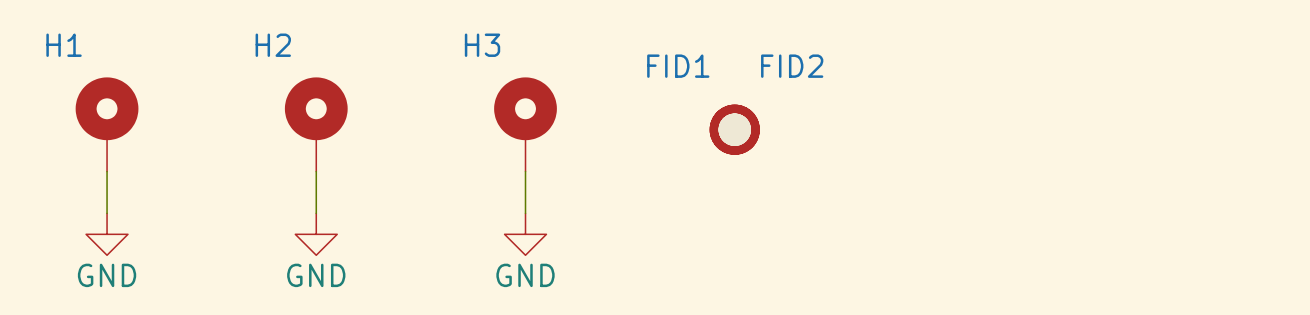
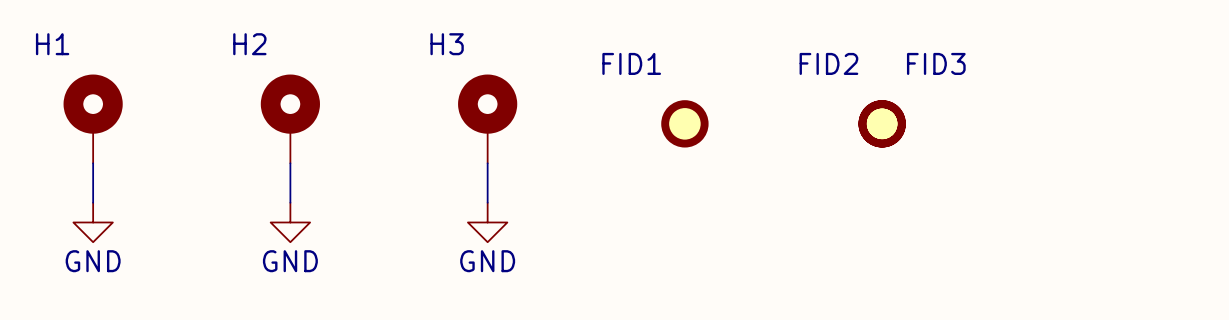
FID2 name position: FID2 (792, 66) -> FID2 (828, 63)
FID2 position: (734, 129) -> (882, 123)
FID3: none -> (882, 123)

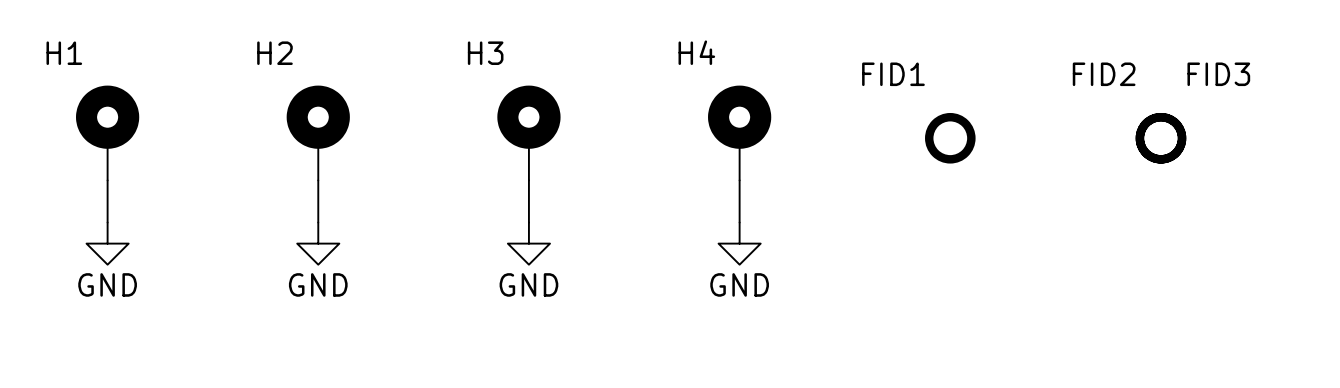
H4: none -> (739, 133)
FID1 position: (684, 123) -> (950, 138)
FID2 position: (882, 123) -> (1160, 138)
FID3 position: (882, 123) -> (1160, 138)
wire: none -> (739, 180) (739, 222)
power symbol: none -> GND (739, 243)

